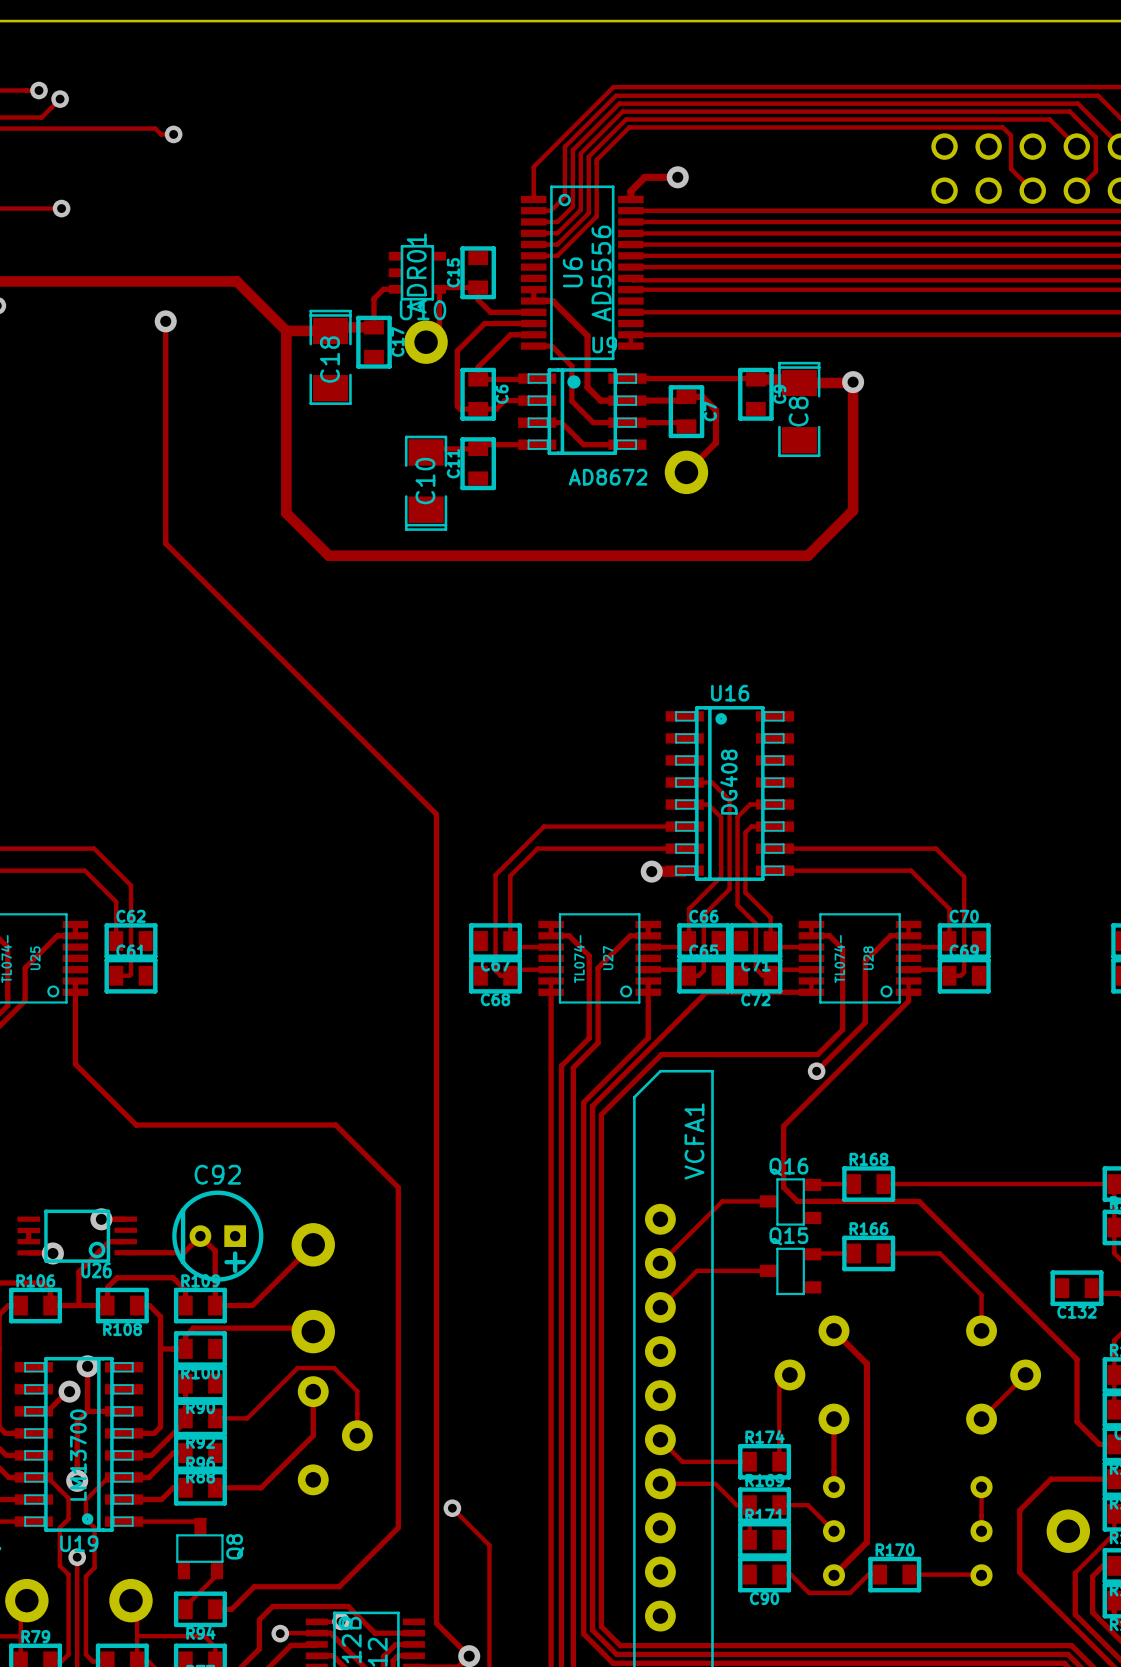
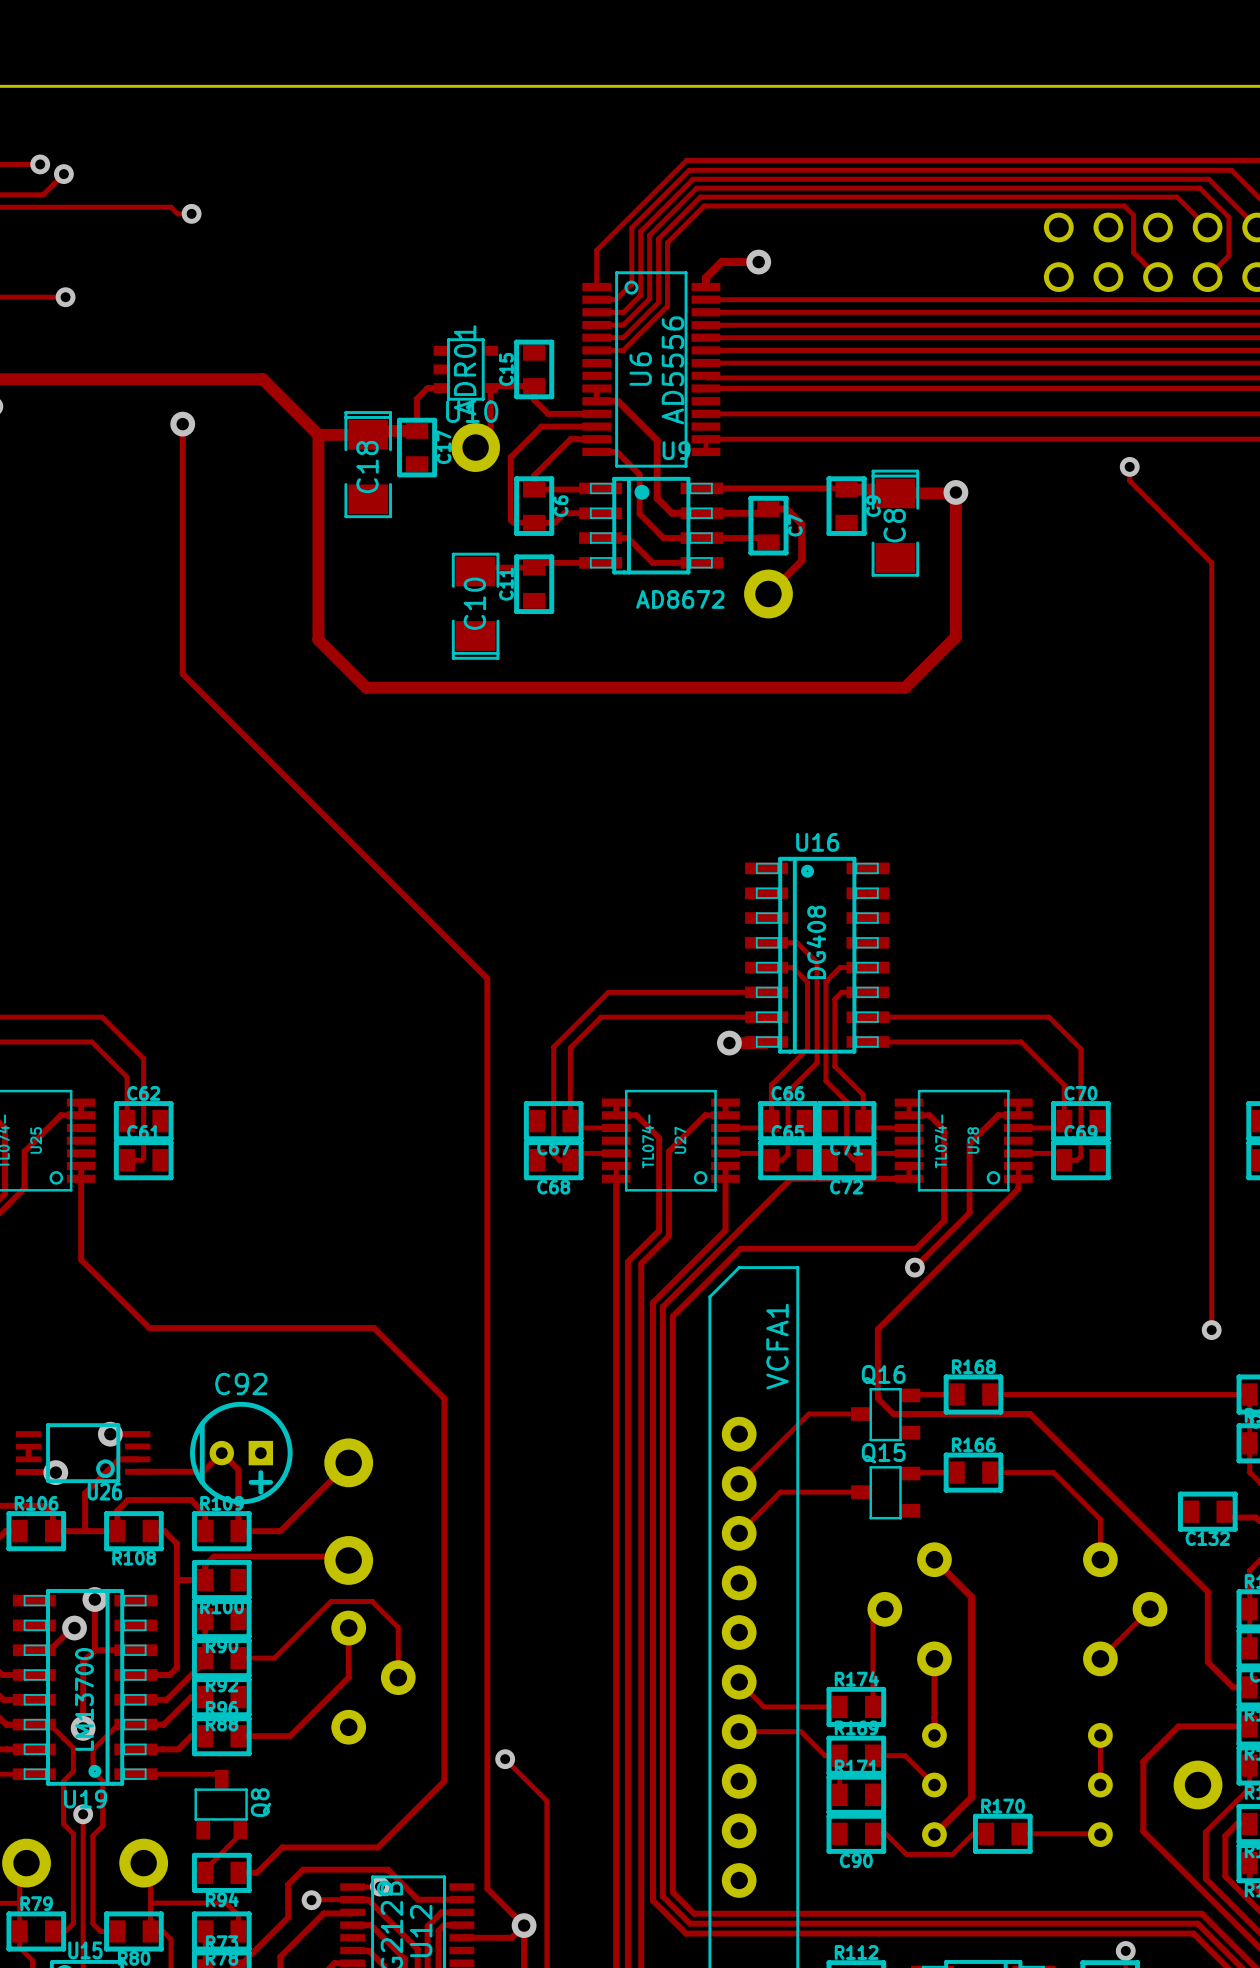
track: none -> (1129, 466) (1129, 480) (1211, 562) (1211, 1330)
via: none -> (1129, 466)
via: none -> (1211, 1330)

